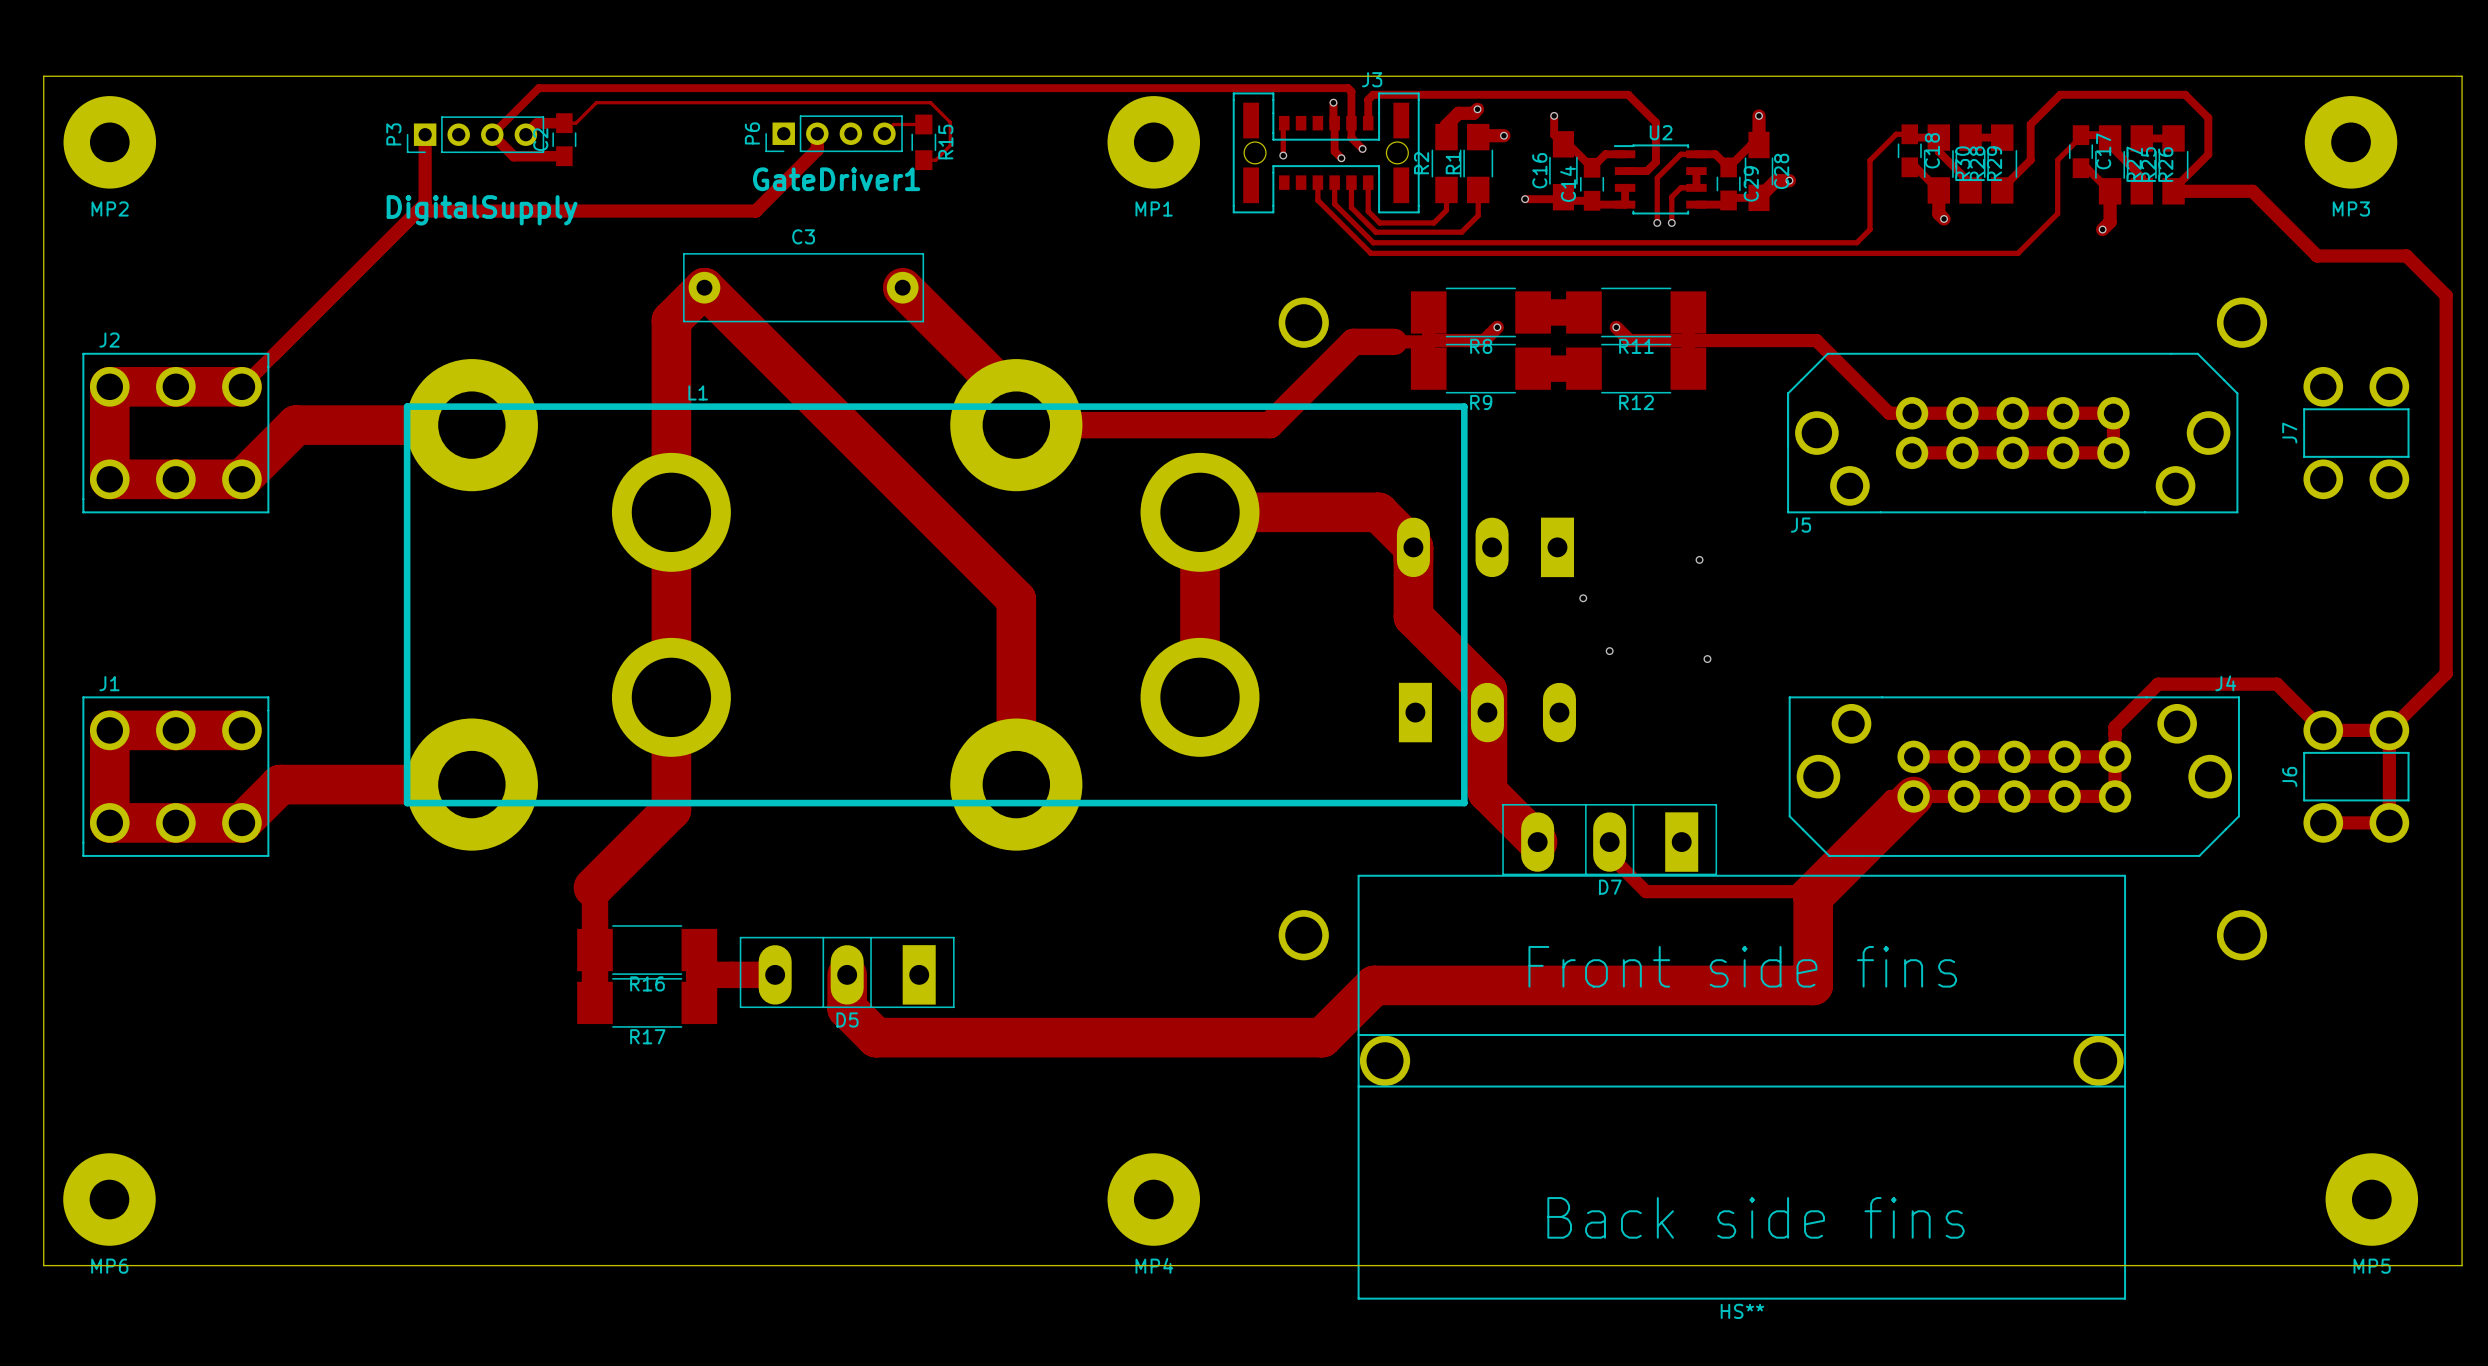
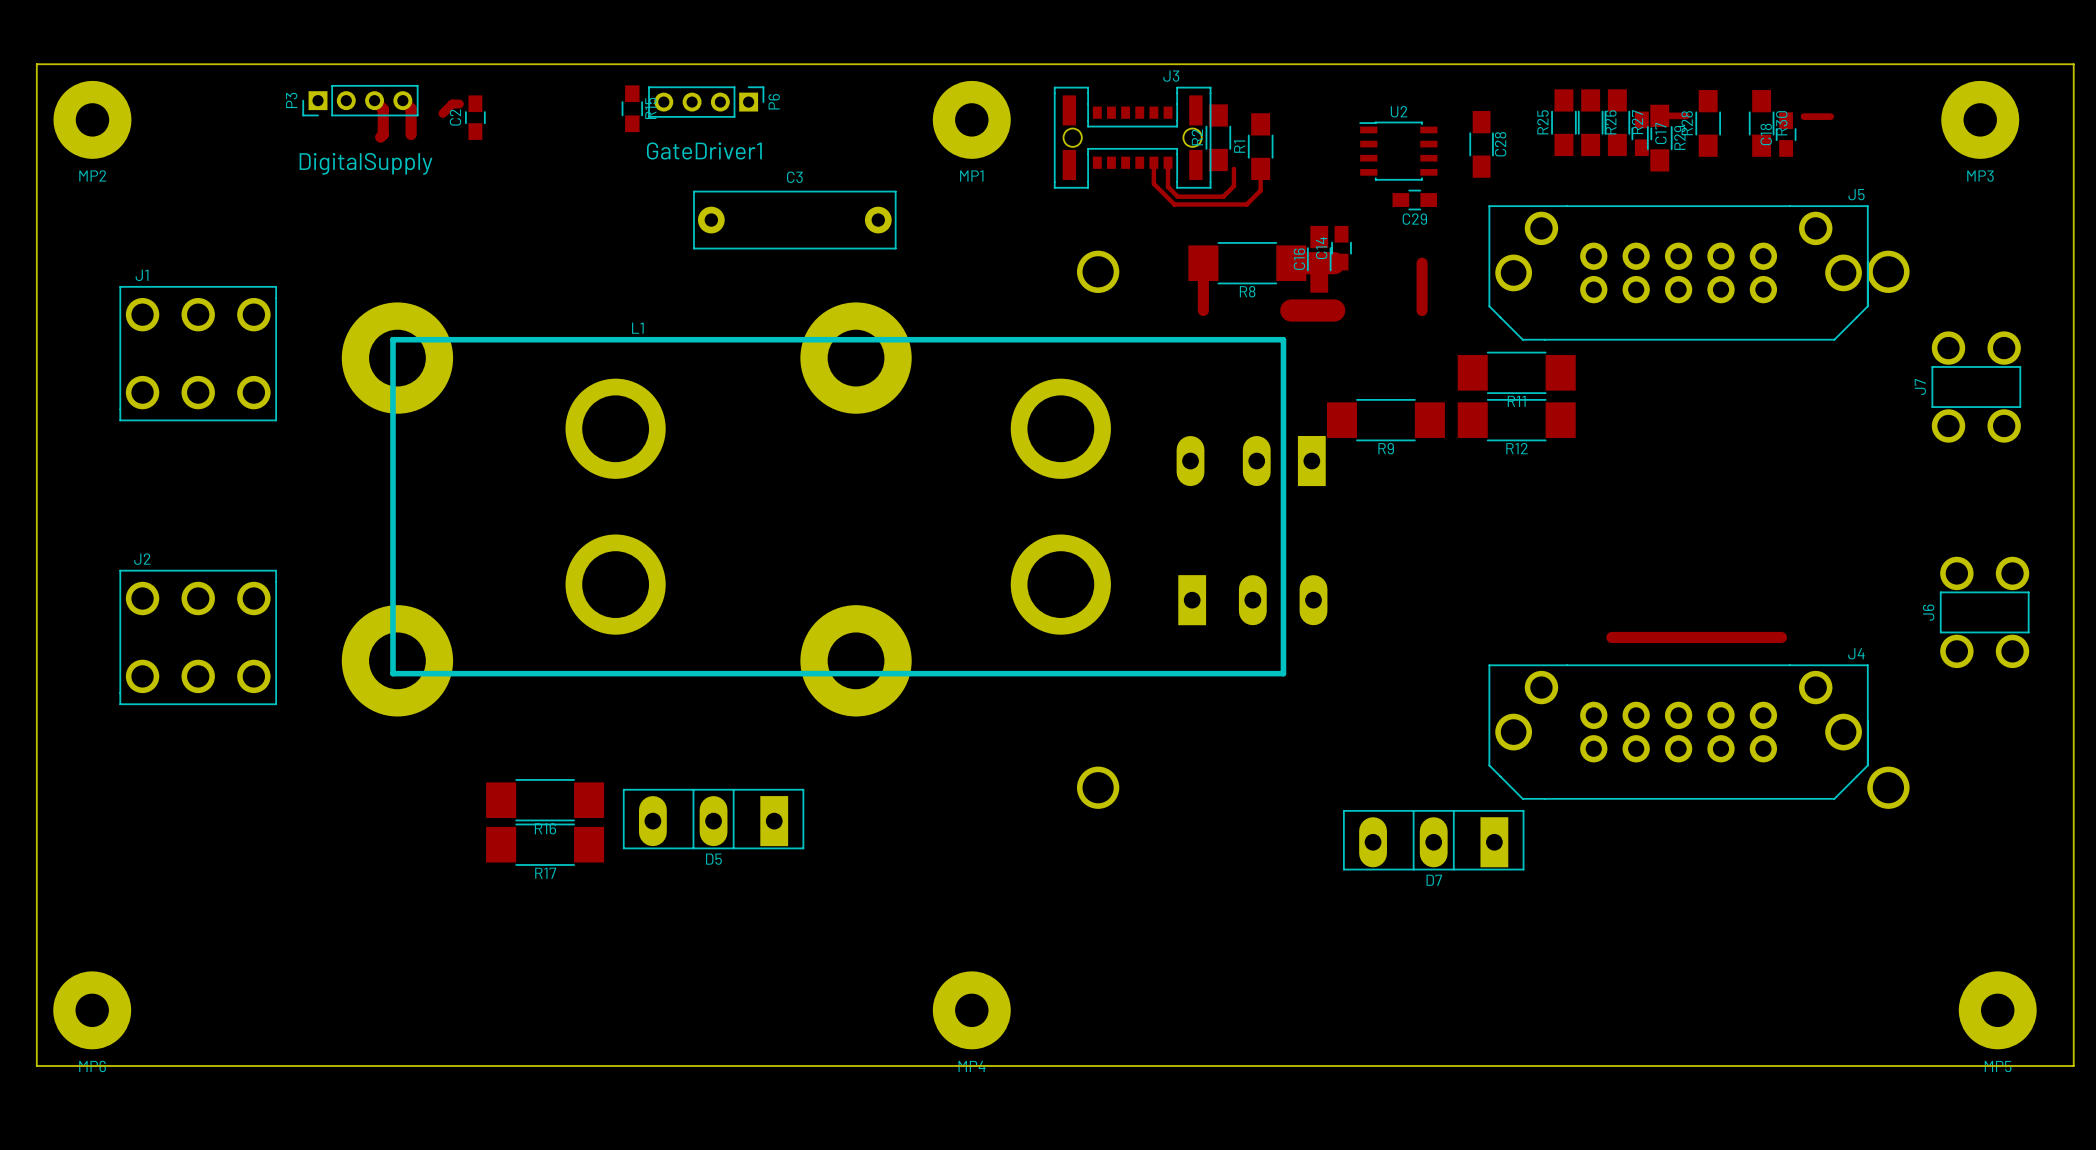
track: (1333, 102) (1334, 151) (1341, 158) -> none
via: (1333, 102) -> none
track: (1477, 109) (1473, 113) (1458, 113) (1446, 125) (1446, 137) -> none
via: (1477, 109) -> none
track: (1554, 115) (1554, 135) (1563, 144) (1568, 144) (1592, 167) (1605, 154) (1625, 154) -> none
via: (1554, 115) -> none
track: (1759, 115) (1759, 144) (1751, 144) (1728, 167) (1715, 154) (1680, 154) (1657, 177) (1657, 222) -> none
via: (1759, 115) -> none
track: none -> (374, 100) (383, 109) (383, 134) (380, 137)
track: none -> (402, 100) (411, 108) (411, 134)
track: (545, 123) (575, 123) (596, 102) (930, 102) (950, 122) (950, 145) (935, 160) (923, 160) -> none
track: (1284, 123) (1283, 155) -> none
track: (1368, 123) (1368, 99) (1373, 94) (1628, 94) (1655, 122) (1655, 162) (1647, 171) (1625, 171) -> none
track: (923, 124) (893, 124) (884, 133) -> none
track: (817, 133) (817, 149) (755, 211) (417, 211) -> none
P6 rotation: 0° (834, 133) -> 180° (706, 102)
track: (425, 134) (425, 203) (241, 386) (109, 386) (109, 479) (241, 479) (296, 425) (471, 425) -> none
P3 position: (475, 134) -> (360, 100)
track: (1503, 135) (1478, 137) -> none
via: (1503, 135) -> none
R15 position: (923, 142) -> (632, 108)
track: (1362, 148) (1351, 137) (1351, 91) (1348, 88) (538, 88) (492, 134) (513, 156) (564, 156) -> none
via: (1362, 148) -> none
C18 position: (1909, 150) -> (1786, 134)
C18 name position: C18 (1932, 150) -> C18 (1766, 134)
C17 position: (2081, 151) -> (1641, 133)
J3 position: (1326, 152) -> (1132, 137)
via: (1283, 155) -> none
via: (1341, 158) -> none
R1 position: (1478, 163) -> (1260, 146)
R30 position: (1938, 164) -> (1761, 123)
R28 position: (2002, 164) -> (1708, 123)
R27 position: (2110, 164) -> (1617, 122)
R26 position: (2141, 164) -> (1590, 122)
R25 position: (2173, 164) -> (1563, 122)
track: (1909, 167) (1915, 167) (1938, 190) (1938, 213) (1944, 218) -> none
track: (2081, 168) (2086, 168) (2110, 191) (2110, 222) (2102, 229) -> none
C16 position: (1563, 170) -> (1319, 259)
track: (1696, 171) (1696, 187) (1680, 187) (1671, 196) (1671, 222) -> none
track: (1789, 180) (1776, 180) (1759, 197) (1731, 197) (1723, 205) (1696, 204) -> none
via: (1789, 180) -> none
track: (1317, 182) (1317, 200) (1370, 253) (2018, 253) (2057, 213) (2057, 160) (2081, 135) (2106, 135) (2110, 138) (2110, 145) (2141, 177) (2141, 191) -> none
track: (1334, 182) (1334, 204) (1373, 242) (1394, 242) -> (1153, 162) (1153, 183) (1174, 204)
track: (1351, 182) (1351, 207) (1375, 232) (1461, 232) (1478, 215) (1478, 189) -> none
track: (1368, 182) (1368, 211) (1379, 222) (1433, 222) (1446, 210) (1446, 189) -> (1168, 162) (1168, 186) (1177, 196) (1223, 196) (1233, 186) (1233, 168)
C29 rotation: 0° (1728, 183) -> 90° clockwise (1414, 200)
C29 position: (1728, 183) -> (1414, 200)
C14 position: (1592, 184) -> (1341, 248)
track: (1625, 187) (1625, 204) (1595, 204) (1592, 200) (1567, 200) (1563, 197) (1561, 199) (1525, 199) -> none
track: (1970, 190) (1970, 183) (1938, 151) (1938, 137) (1913, 137) (1909, 134) (1896, 134) (1870, 160) (1870, 229) (1856, 242) (1480, 242) -> (1260, 168) (1260, 190) (1246, 204)
track: (2002, 190) (2030, 160) (2030, 124) (2060, 94) (2185, 94) (2208, 117) (2208, 154) (2173, 191) (2252, 191) (2317, 255) (2406, 255) (2446, 295) (2446, 673) (2389, 730) -> none
via: (1525, 199) -> none
text position: DigitalSupply (482, 210) -> DigitalSupply (366, 163)
via: (1944, 218) -> none
via: (1657, 222) -> none
via: (1671, 222) -> none
via: (2102, 229) -> none
C3 position: (803, 287) -> (794, 220)
track: (902, 287) (1016, 401) (1016, 425) -> none
R11 position: (1636, 312) -> (1516, 372)
track: (1497, 327) (1484, 340) (1353, 341) (1270, 425) (1016, 425) -> none
via: (1497, 327) -> none
track: (1616, 327) (1629, 340) (1816, 340) (1889, 413) (2113, 413) (2113, 452) (1912, 452) -> none
via: (1616, 327) -> none
R9 position: (1480, 368) -> (1385, 420)
R12 position: (1636, 368) -> (1516, 420)
J2 position: (175, 433) -> (198, 637)
J5 rotation: 0° (2012, 433) -> 180° (1678, 272)
J7 position: (2356, 433) -> (1976, 387)
via: (1699, 559) -> none
via: (1583, 598) -> none
L1 position: (935, 604) -> (838, 506)
via: (1609, 651) -> none
via: (1707, 659) -> none
track: (1200, 697) (1200, 512) (1378, 512) (1413, 547) (1413, 616) (1487, 690) (1487, 791) (1537, 842) -> none
track: (241, 730) (109, 730) (109, 822) (241, 822) (280, 784) (471, 784) -> none
track: (2389, 730) (2389, 822) (2323, 822) -> none
track: (2389, 730) (2323, 730) (2277, 684) (2158, 684) (2115, 727) (2115, 796) (1890, 796) (1795, 891) (1646, 891) (1609, 855) (1609, 842) -> none
track: (1034, 766) (1016, 784) (1016, 599) (704, 287) (671, 320) (671, 809) (593, 887) (594, 889) (594, 1002) -> none
J1 position: (175, 776) -> (198, 353)
J4 position: (2014, 776) -> (1678, 732)
J6 position: (2356, 776) -> (1984, 612)
track: (1913, 796) (1813, 896) (1813, 985) (1374, 985) (1322, 1037) (876, 1037) (847, 1008) (847, 974) -> none
D7 position: (1609, 839) -> (1433, 840)
track: (699, 974) (775, 974) -> none
HS**: (1741, 1087) -> none

